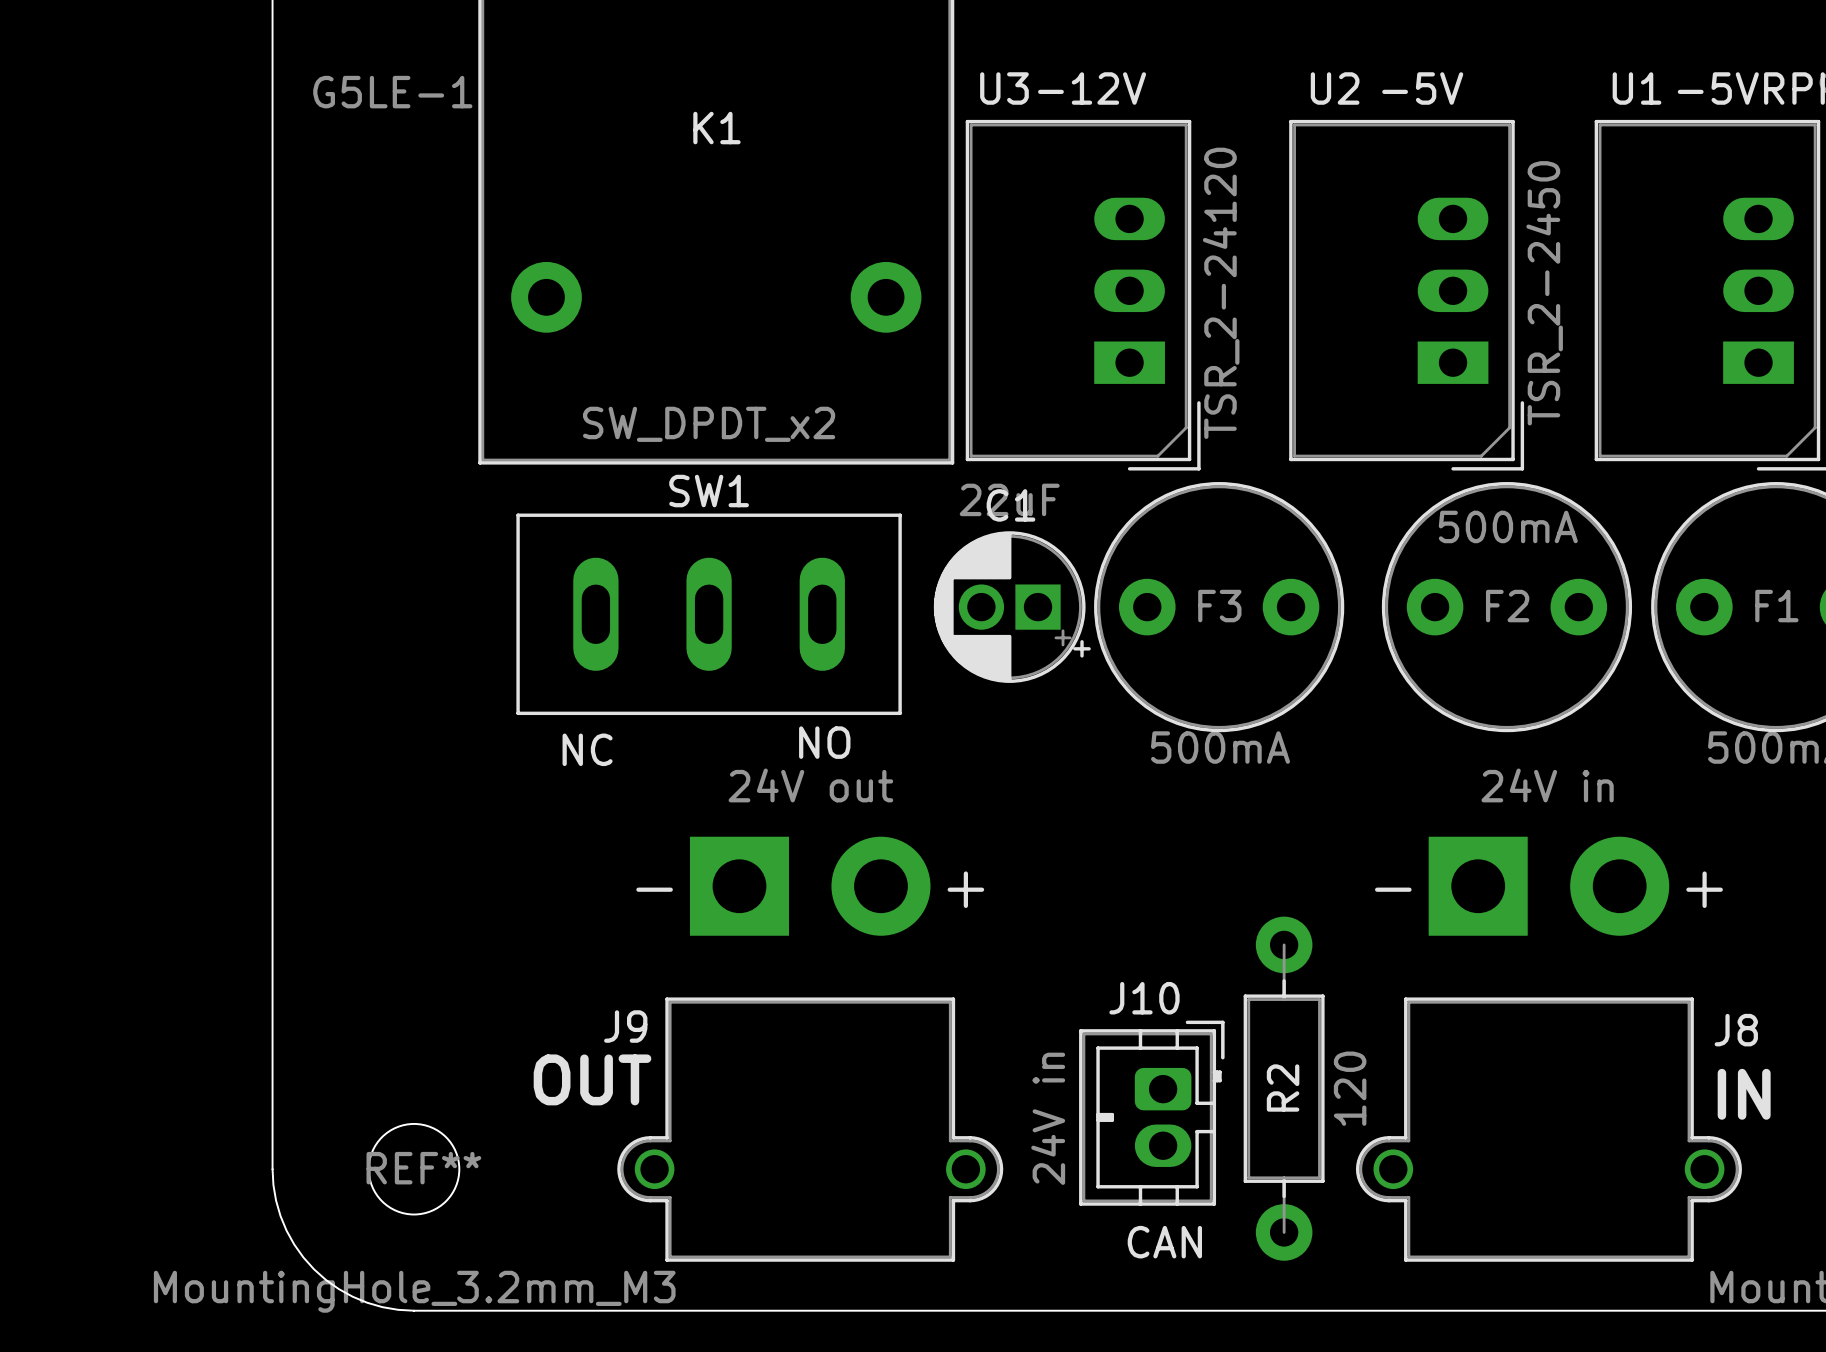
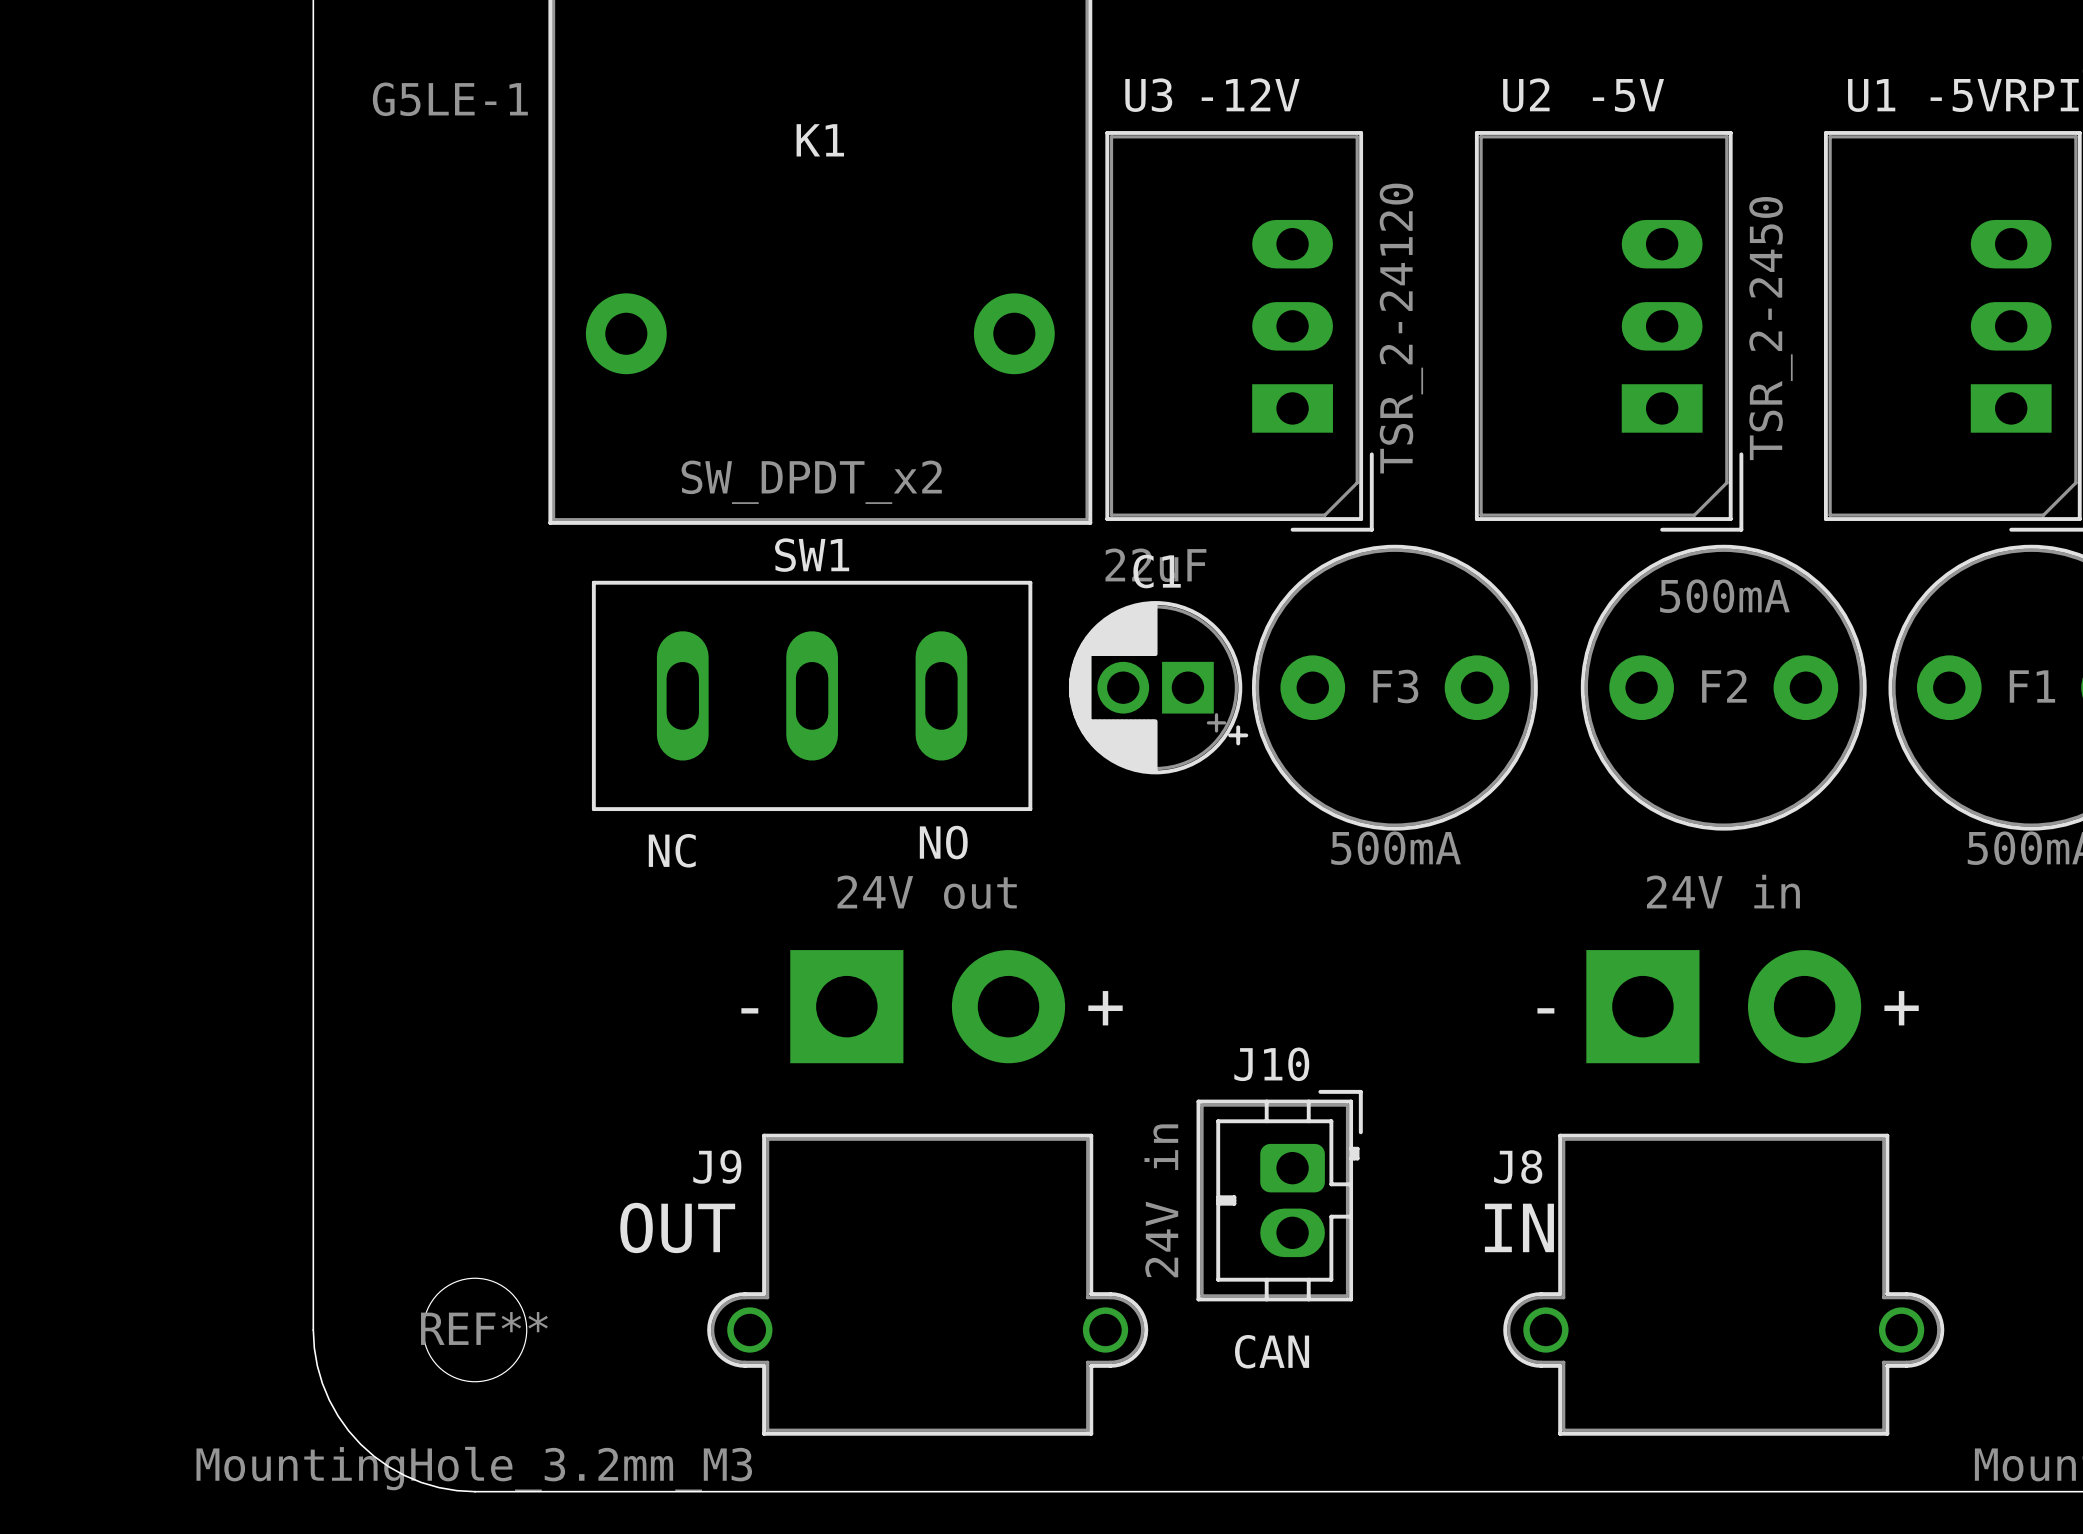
J8 name position: J8 (1736, 1030) -> J8 (1518, 1166)
J8 position: (1548, 1049) -> (1723, 1192)
R2: 120 (1284, 1088) -> none
text position: IN (1744, 1094) -> IN (1519, 1227)
J10 position: (1151, 1113) -> (1279, 1195)
text position: CAN (1164, 1242) -> CAN (1272, 1351)

